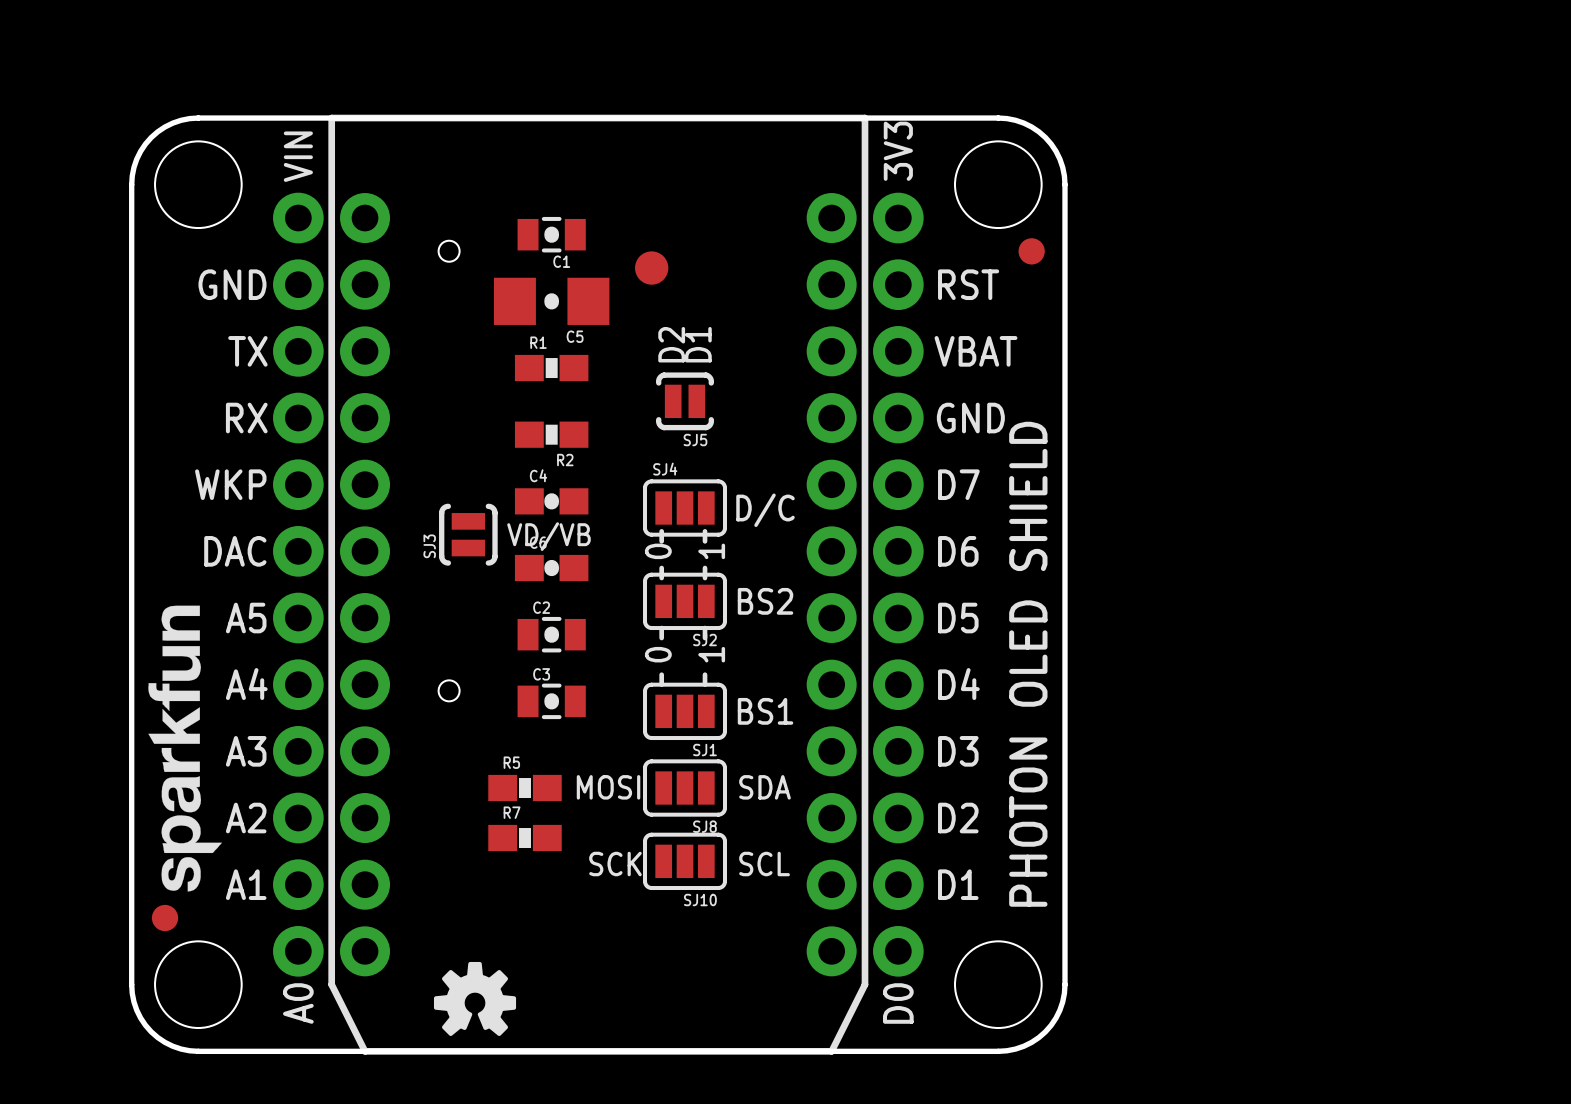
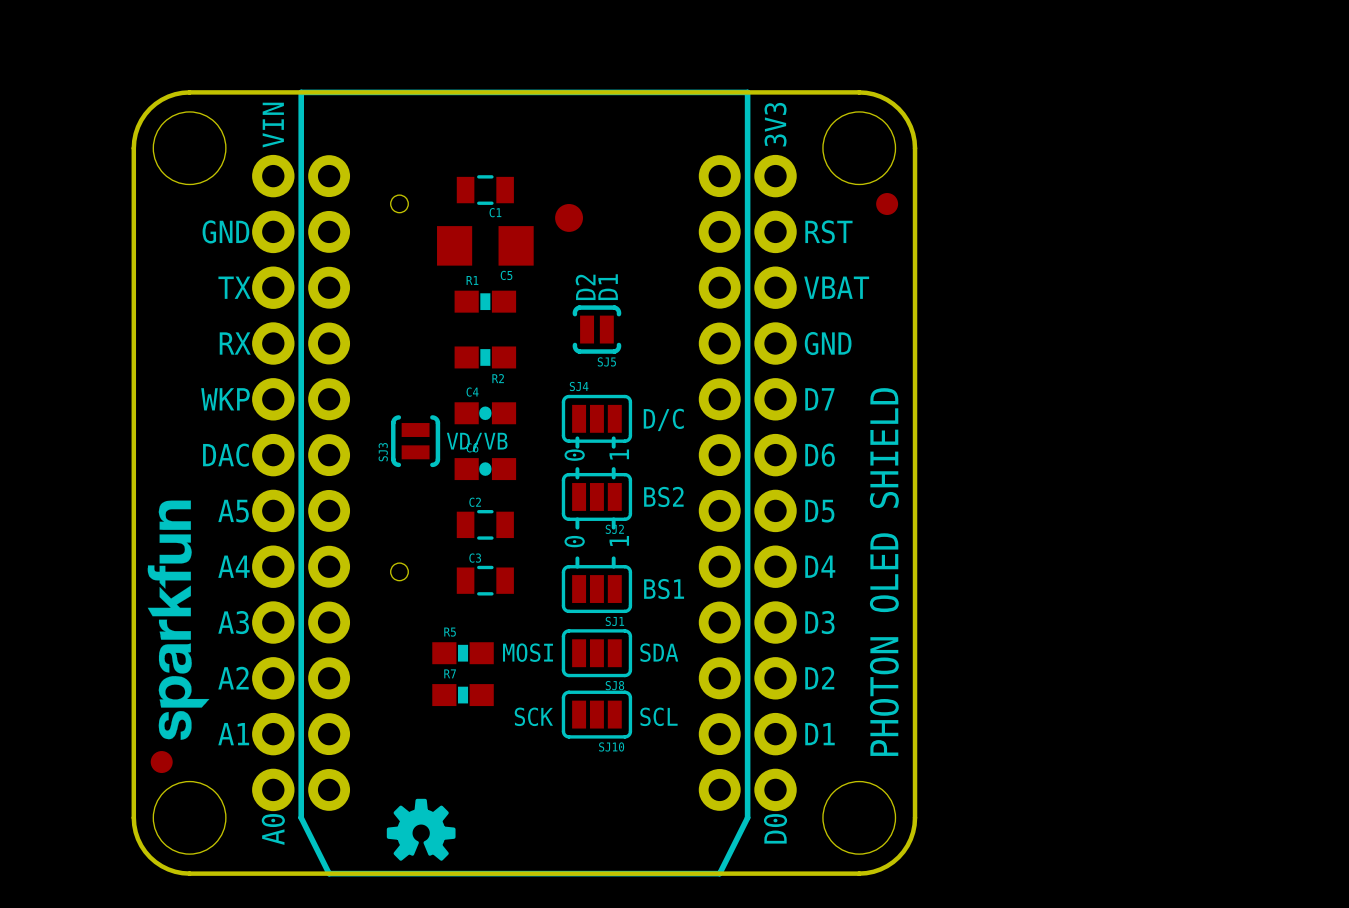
C1 footprint: [517, 216, 586, 253] -> [456, 175, 514, 205]
C5 footprint: [493, 277, 610, 325] -> [437, 226, 534, 266]
C2 footprint: [517, 616, 586, 653] -> [456, 510, 514, 540]
C3 footprint: [517, 683, 586, 720] -> [456, 565, 514, 596]

